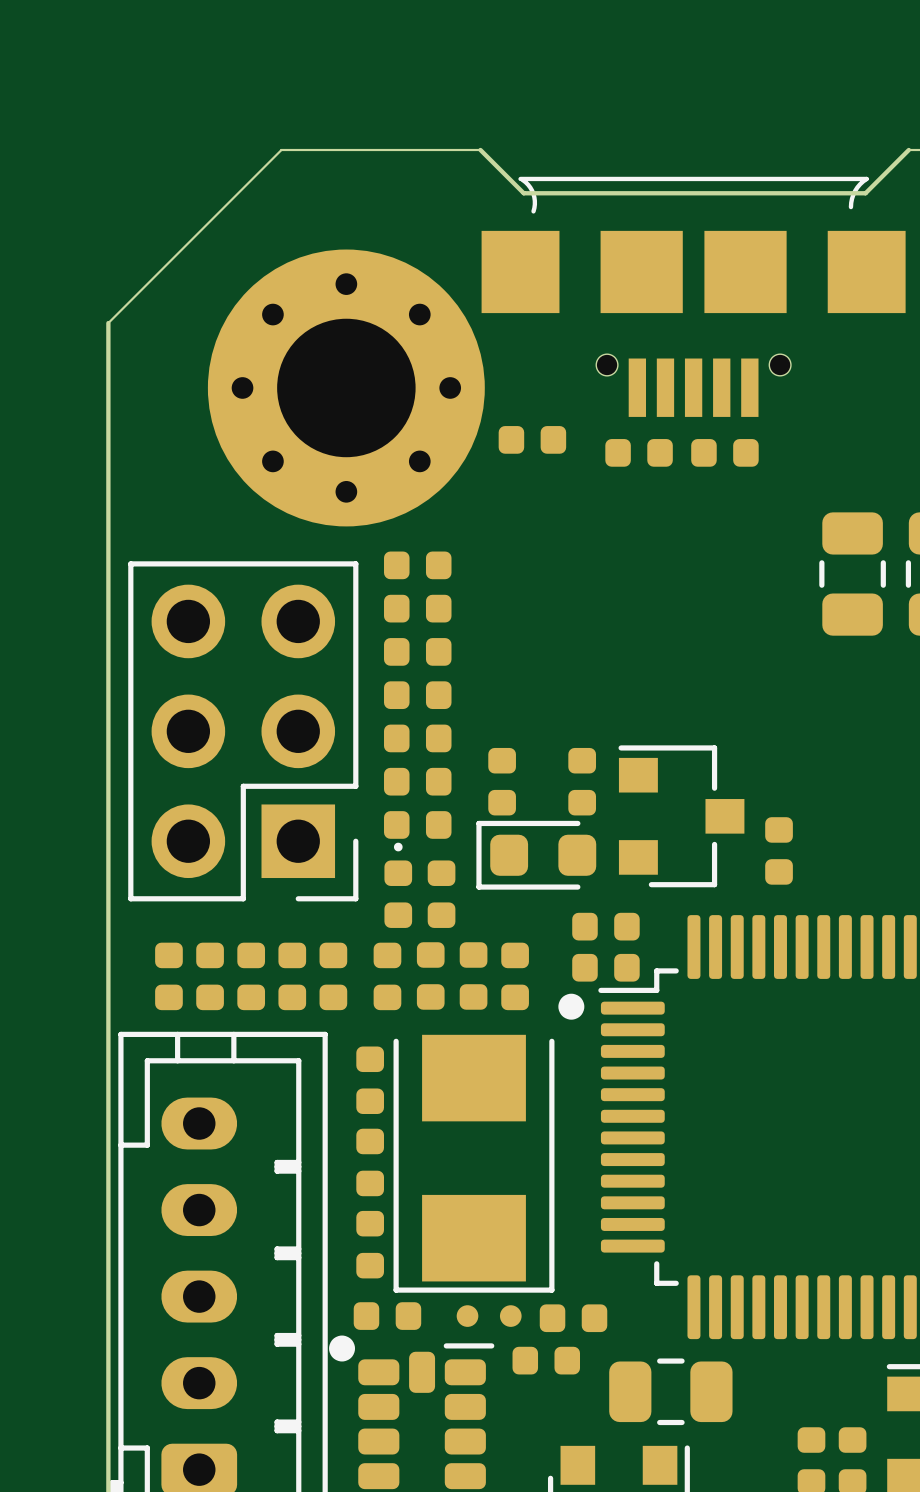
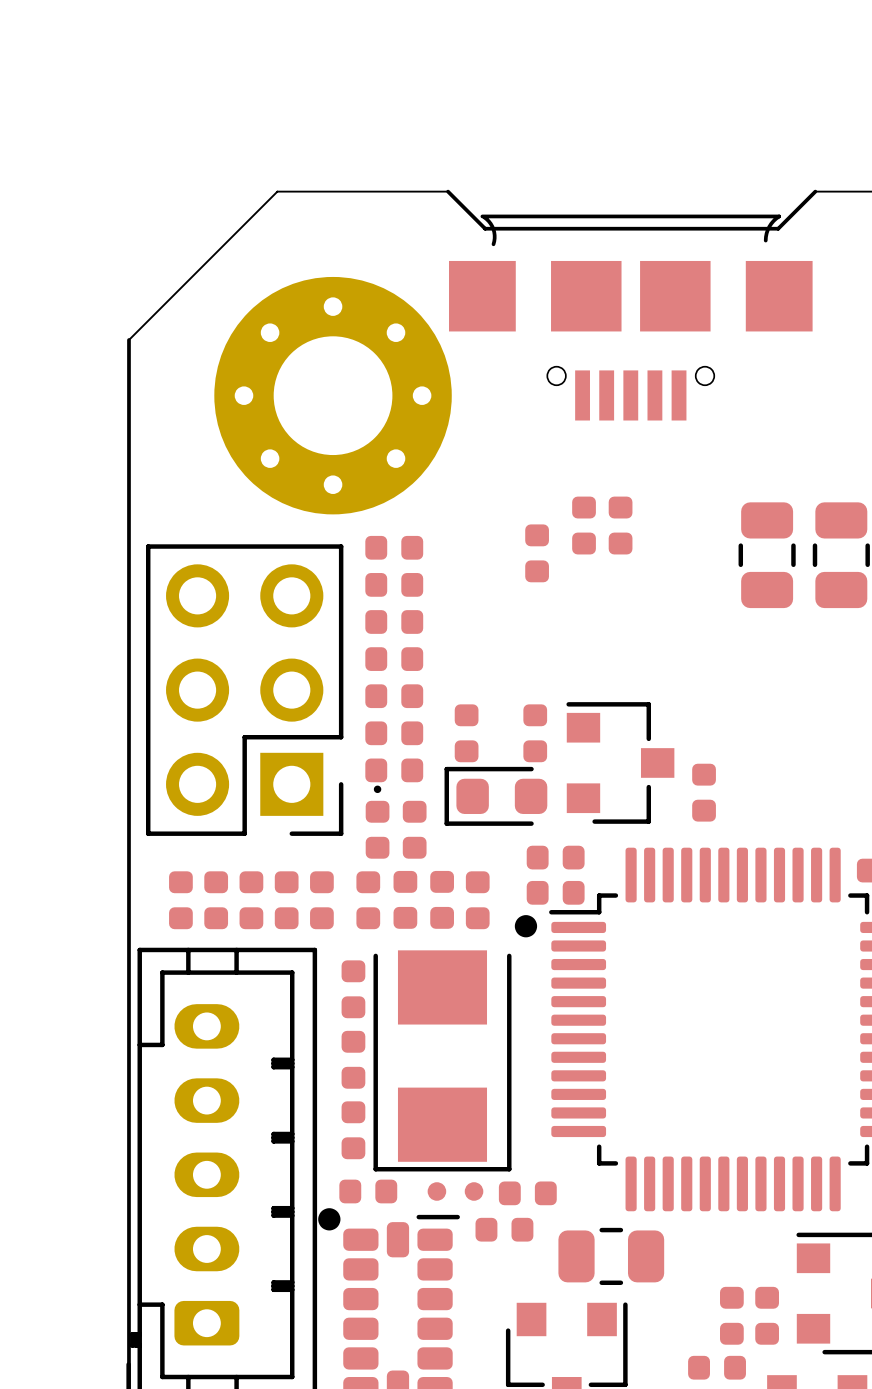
part: (532, 439) -> none
part: (639, 452) -> none
part: (724, 452) -> none
part: none -> (584, 525)
part: none -> (620, 525)
part: none -> (537, 553)

